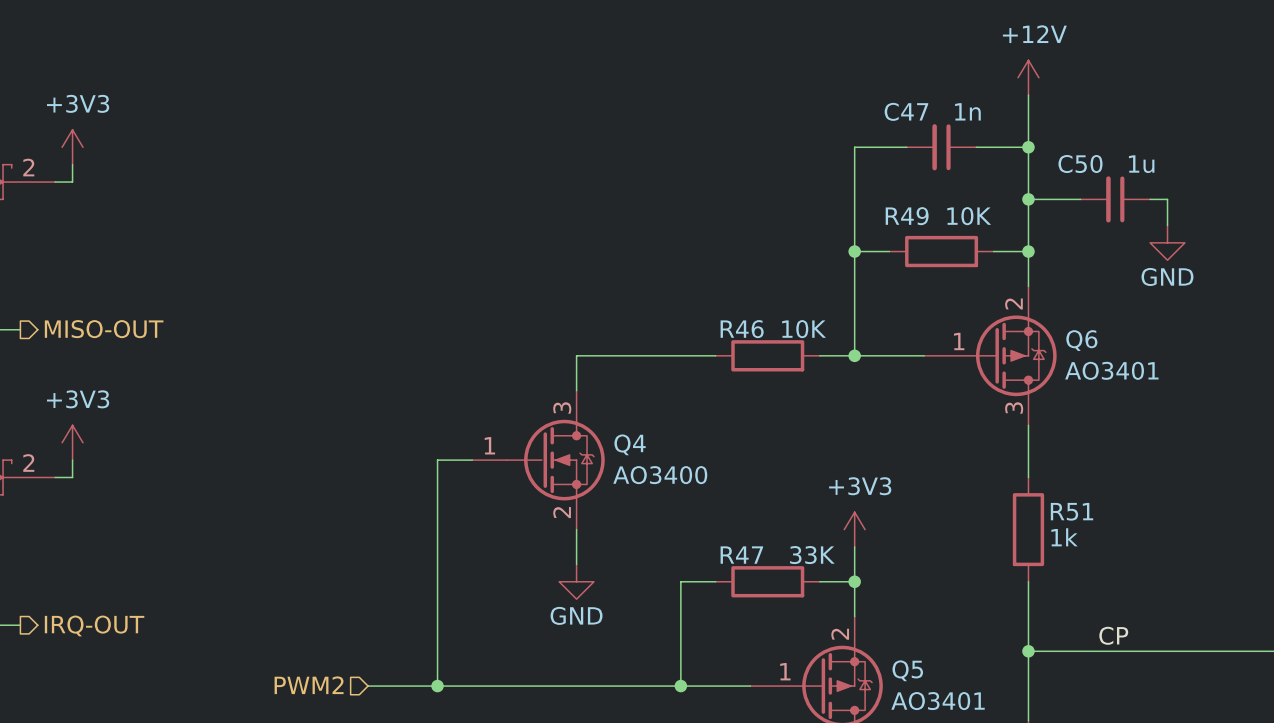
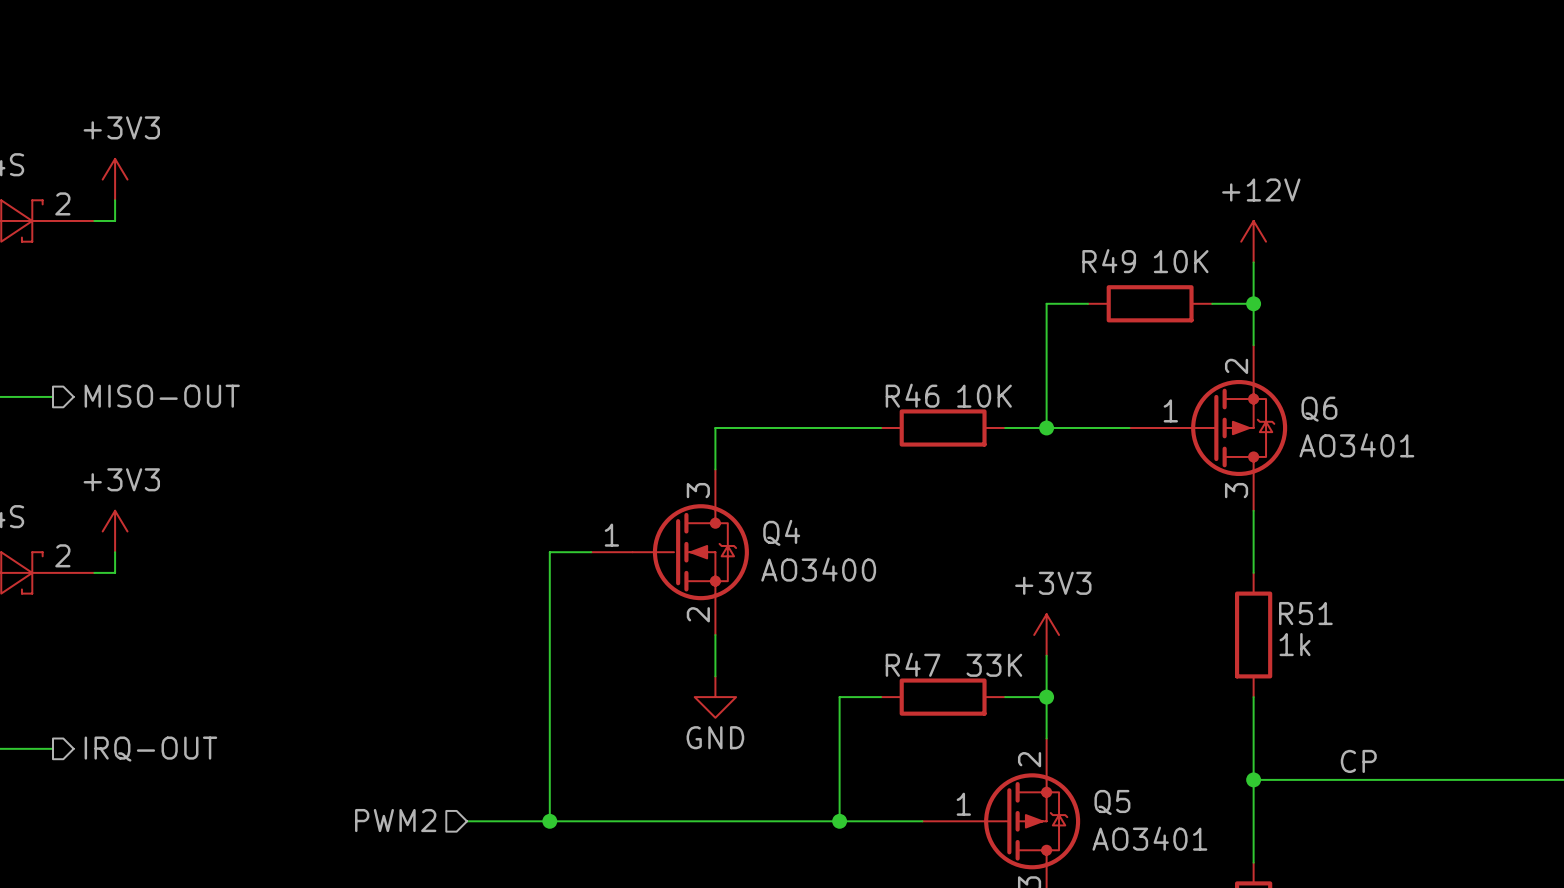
power symbol position: +12V (1028, 77) -> +12V (1253, 241)
wire: (1028, 95) (1028, 216) -> none
wire: (906, 147) (854, 147) (854, 251) -> none
C47: 1n (941, 147) -> none
wire: (976, 147) (1028, 147) -> none
junction: (1028, 147) -> none
wire: (1028, 199) (1080, 199) -> none
junction: (1028, 199) -> none
C50: 1u (1115, 199) -> none
wire: (1150, 199) (1167, 199) (1167, 225) -> none
power symbol: GND (1167, 242) -> none
junction: (854, 251) -> none

